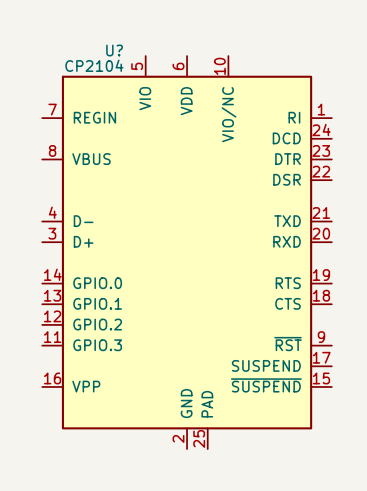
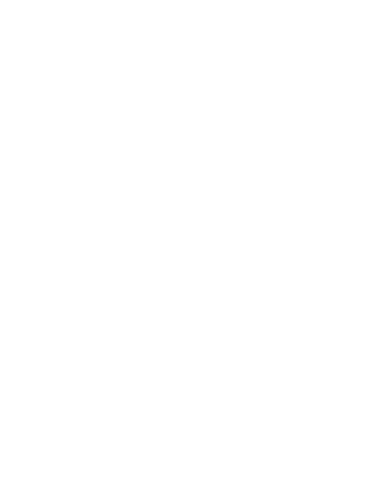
U?: CP2104 (187, 252) -> none

